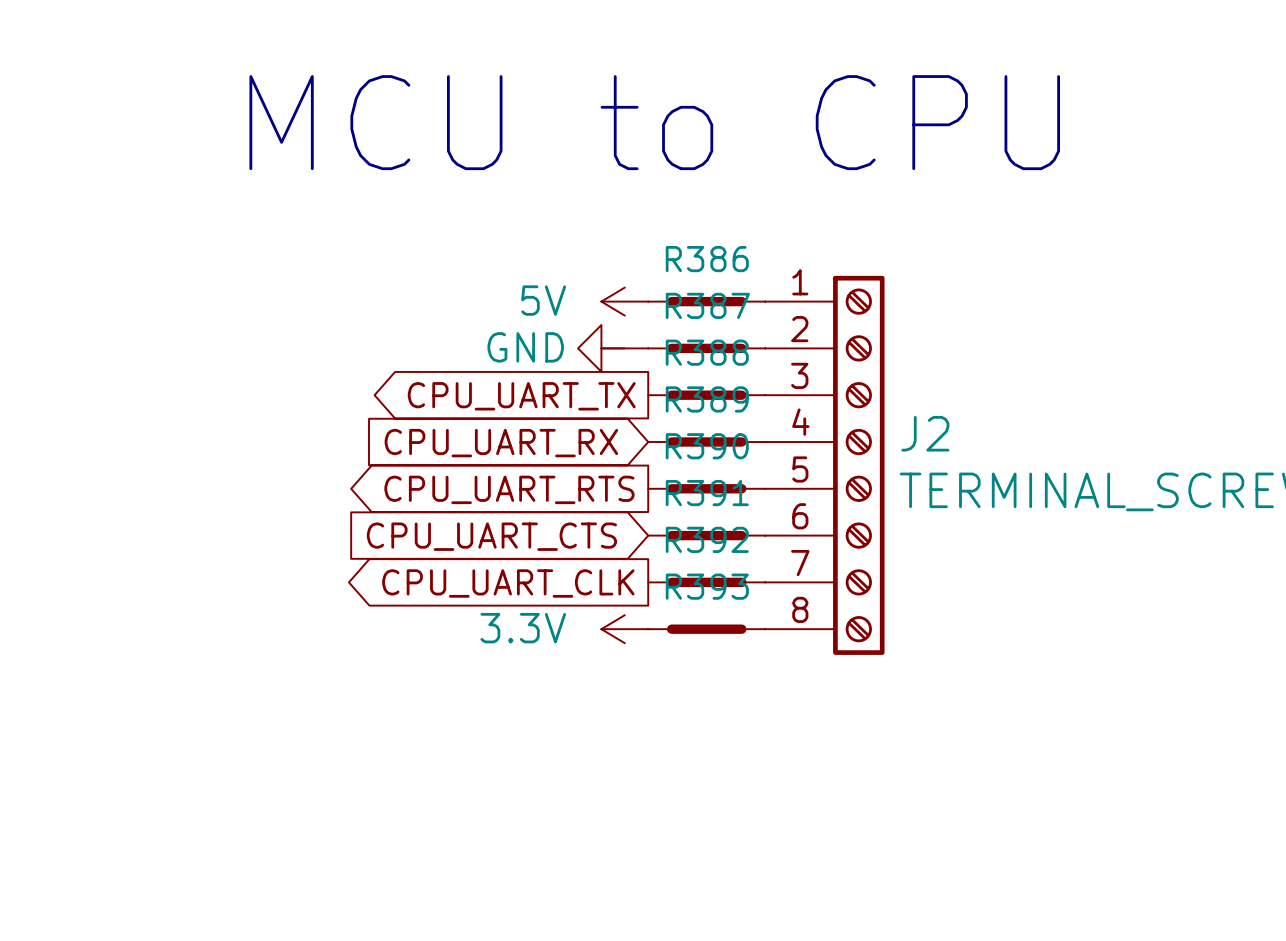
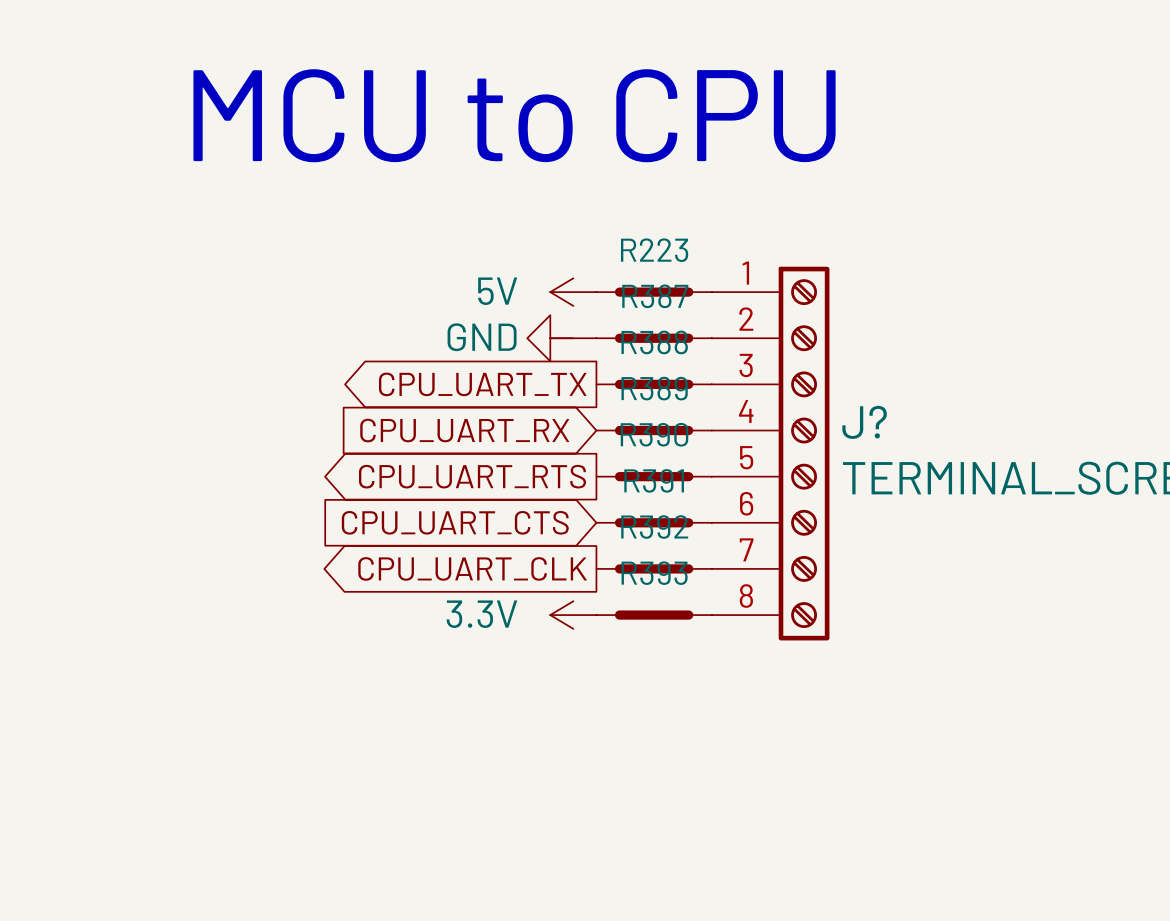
R386 name: R386 (707, 259) -> R223 (654, 250)
J2 name: J2 (925, 433) -> J? (864, 422)

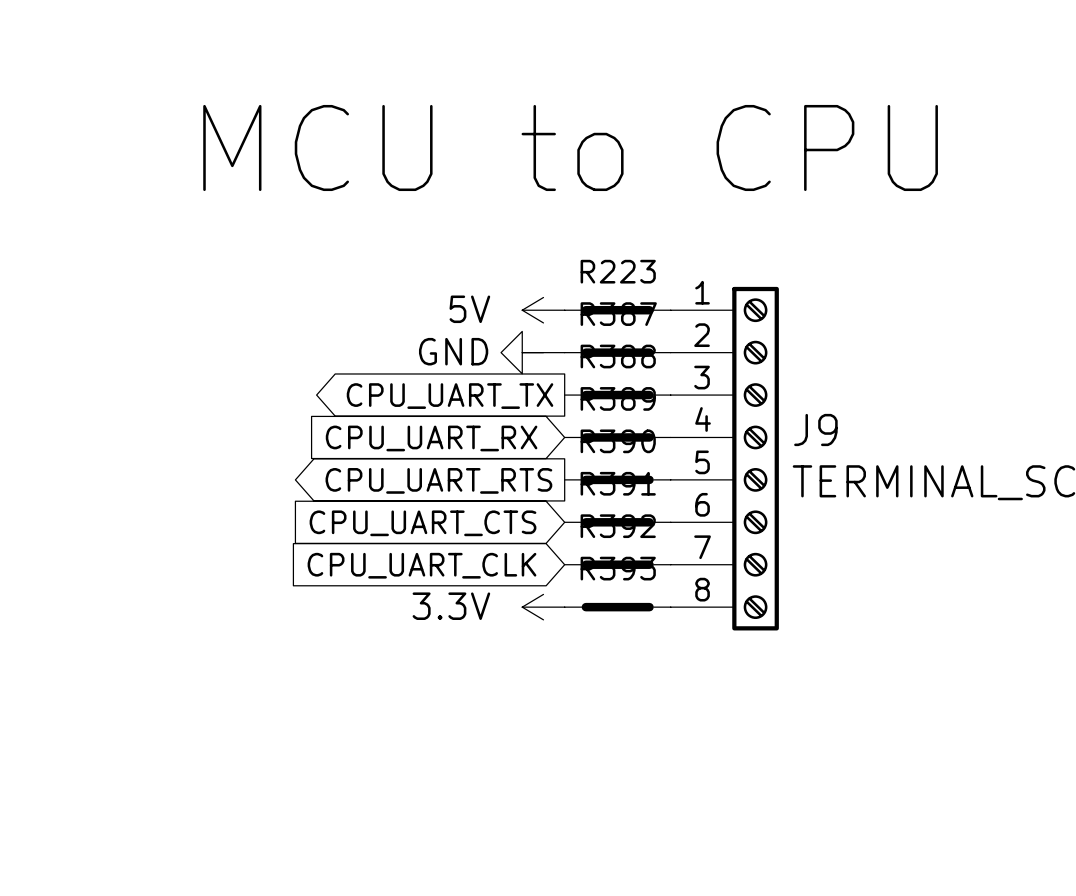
J? name: J? (864, 422) -> J9 (815, 430)
global label shape: output (472, 568) -> input (421, 565)

